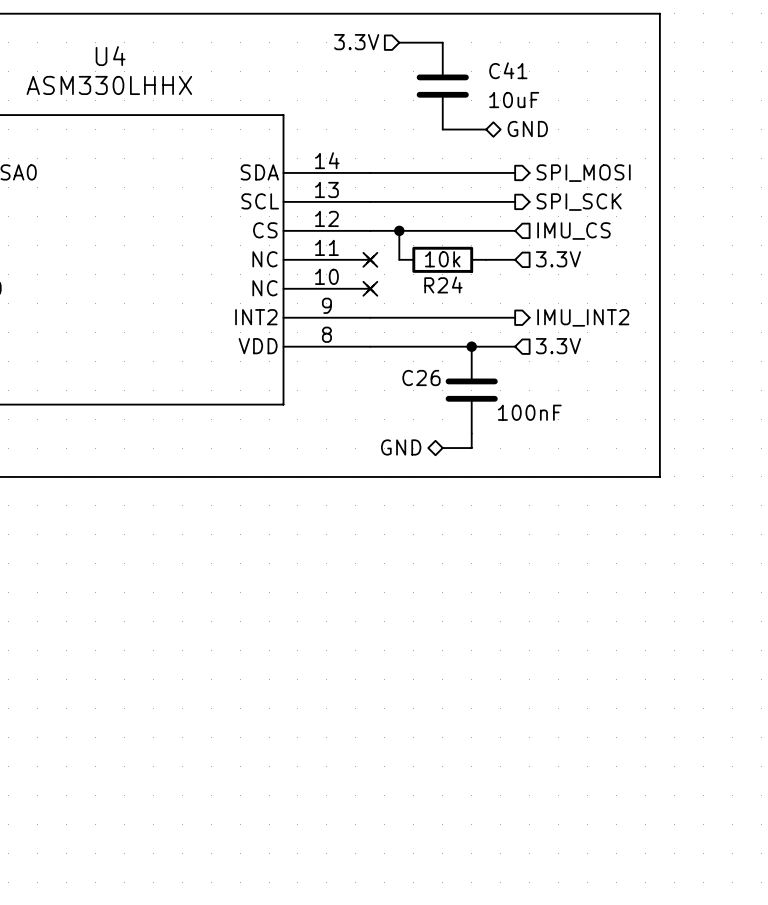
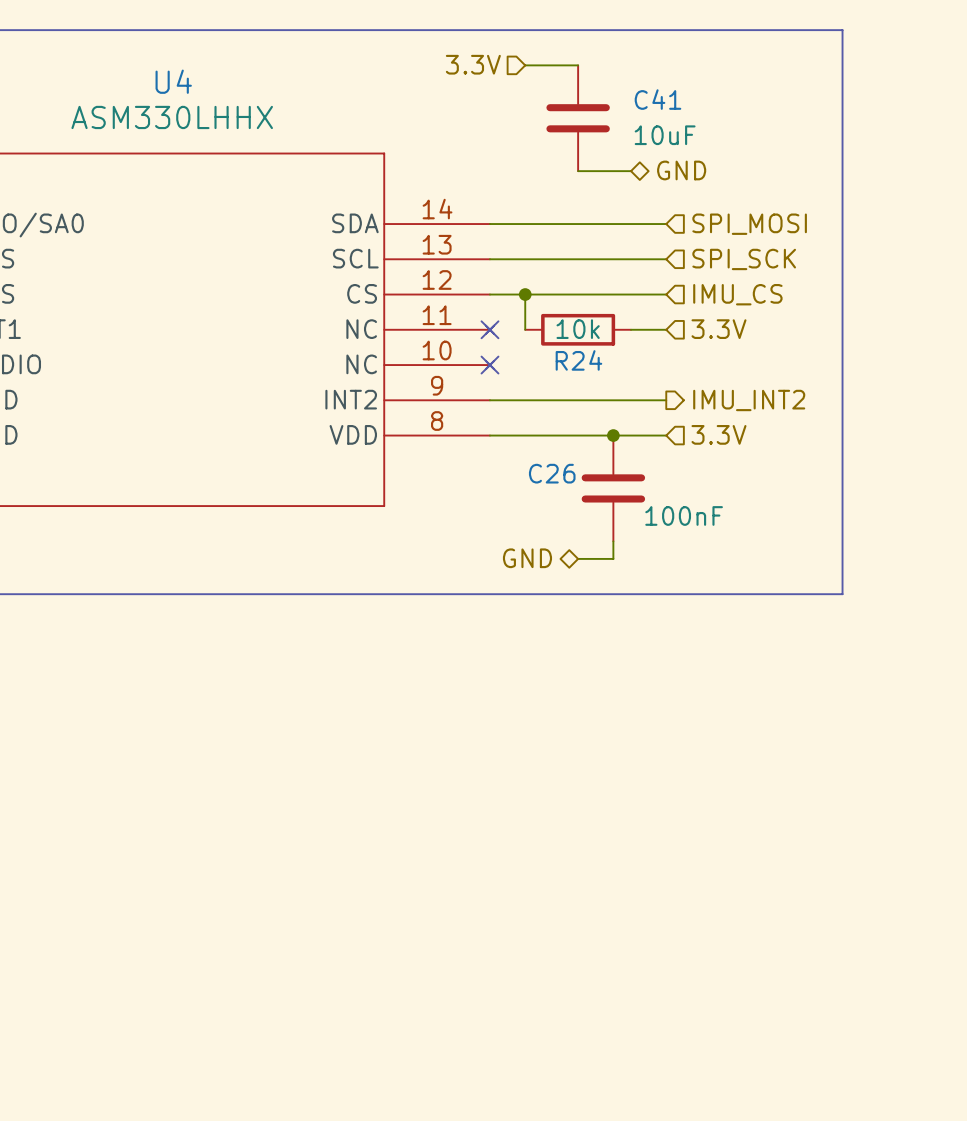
hierarchical label shape: output (583, 173) -> input (749, 224)
hierarchical label shape: output (579, 202) -> input (744, 259)

